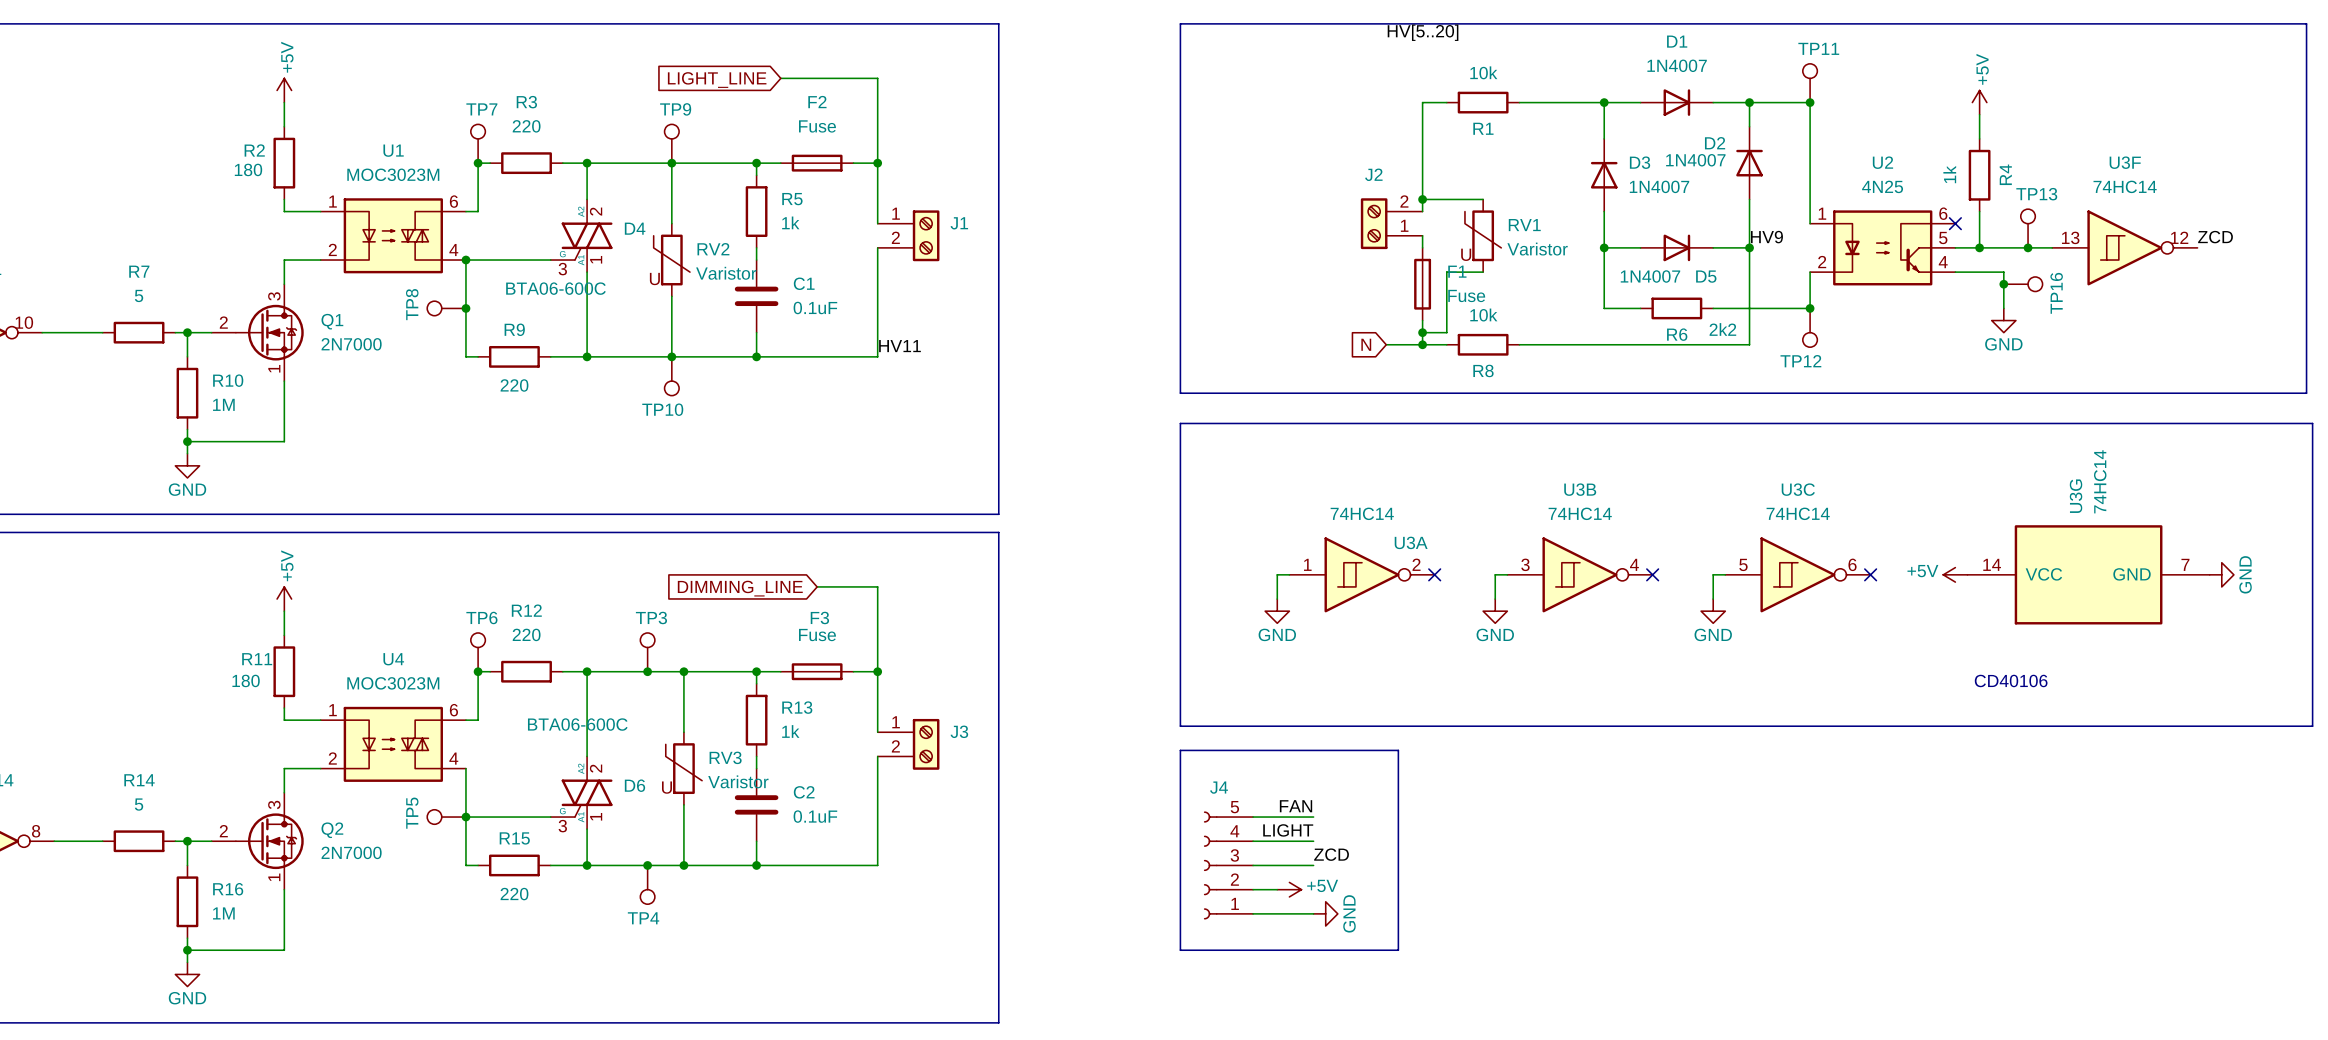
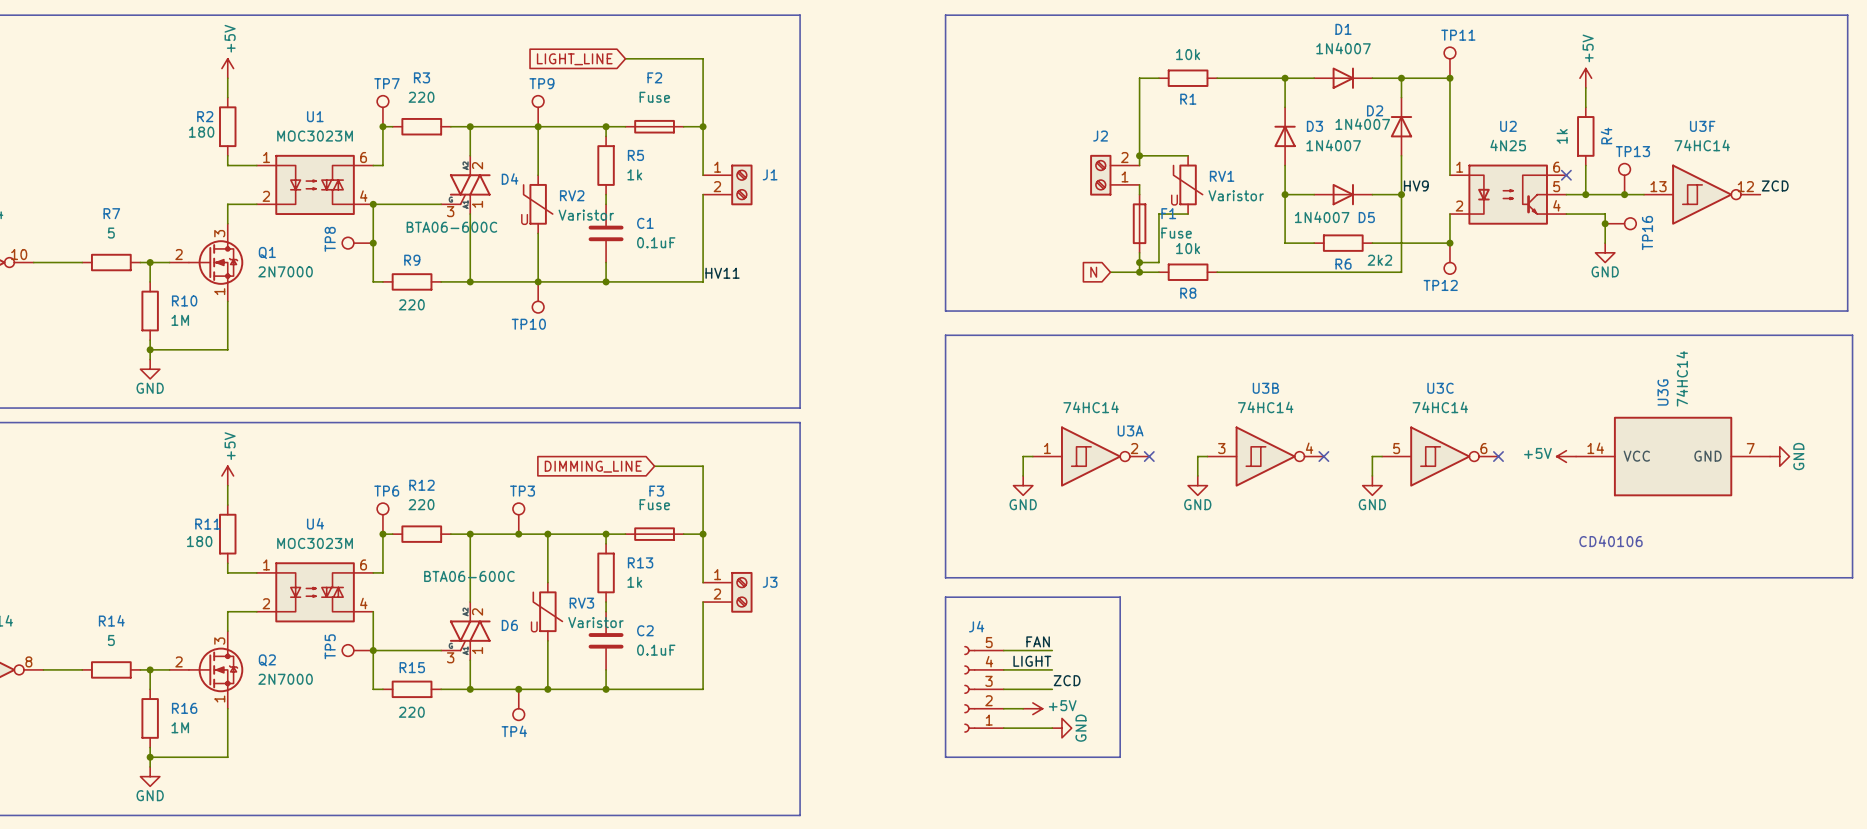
label: HV[5..20] (1423, 32) -> none

